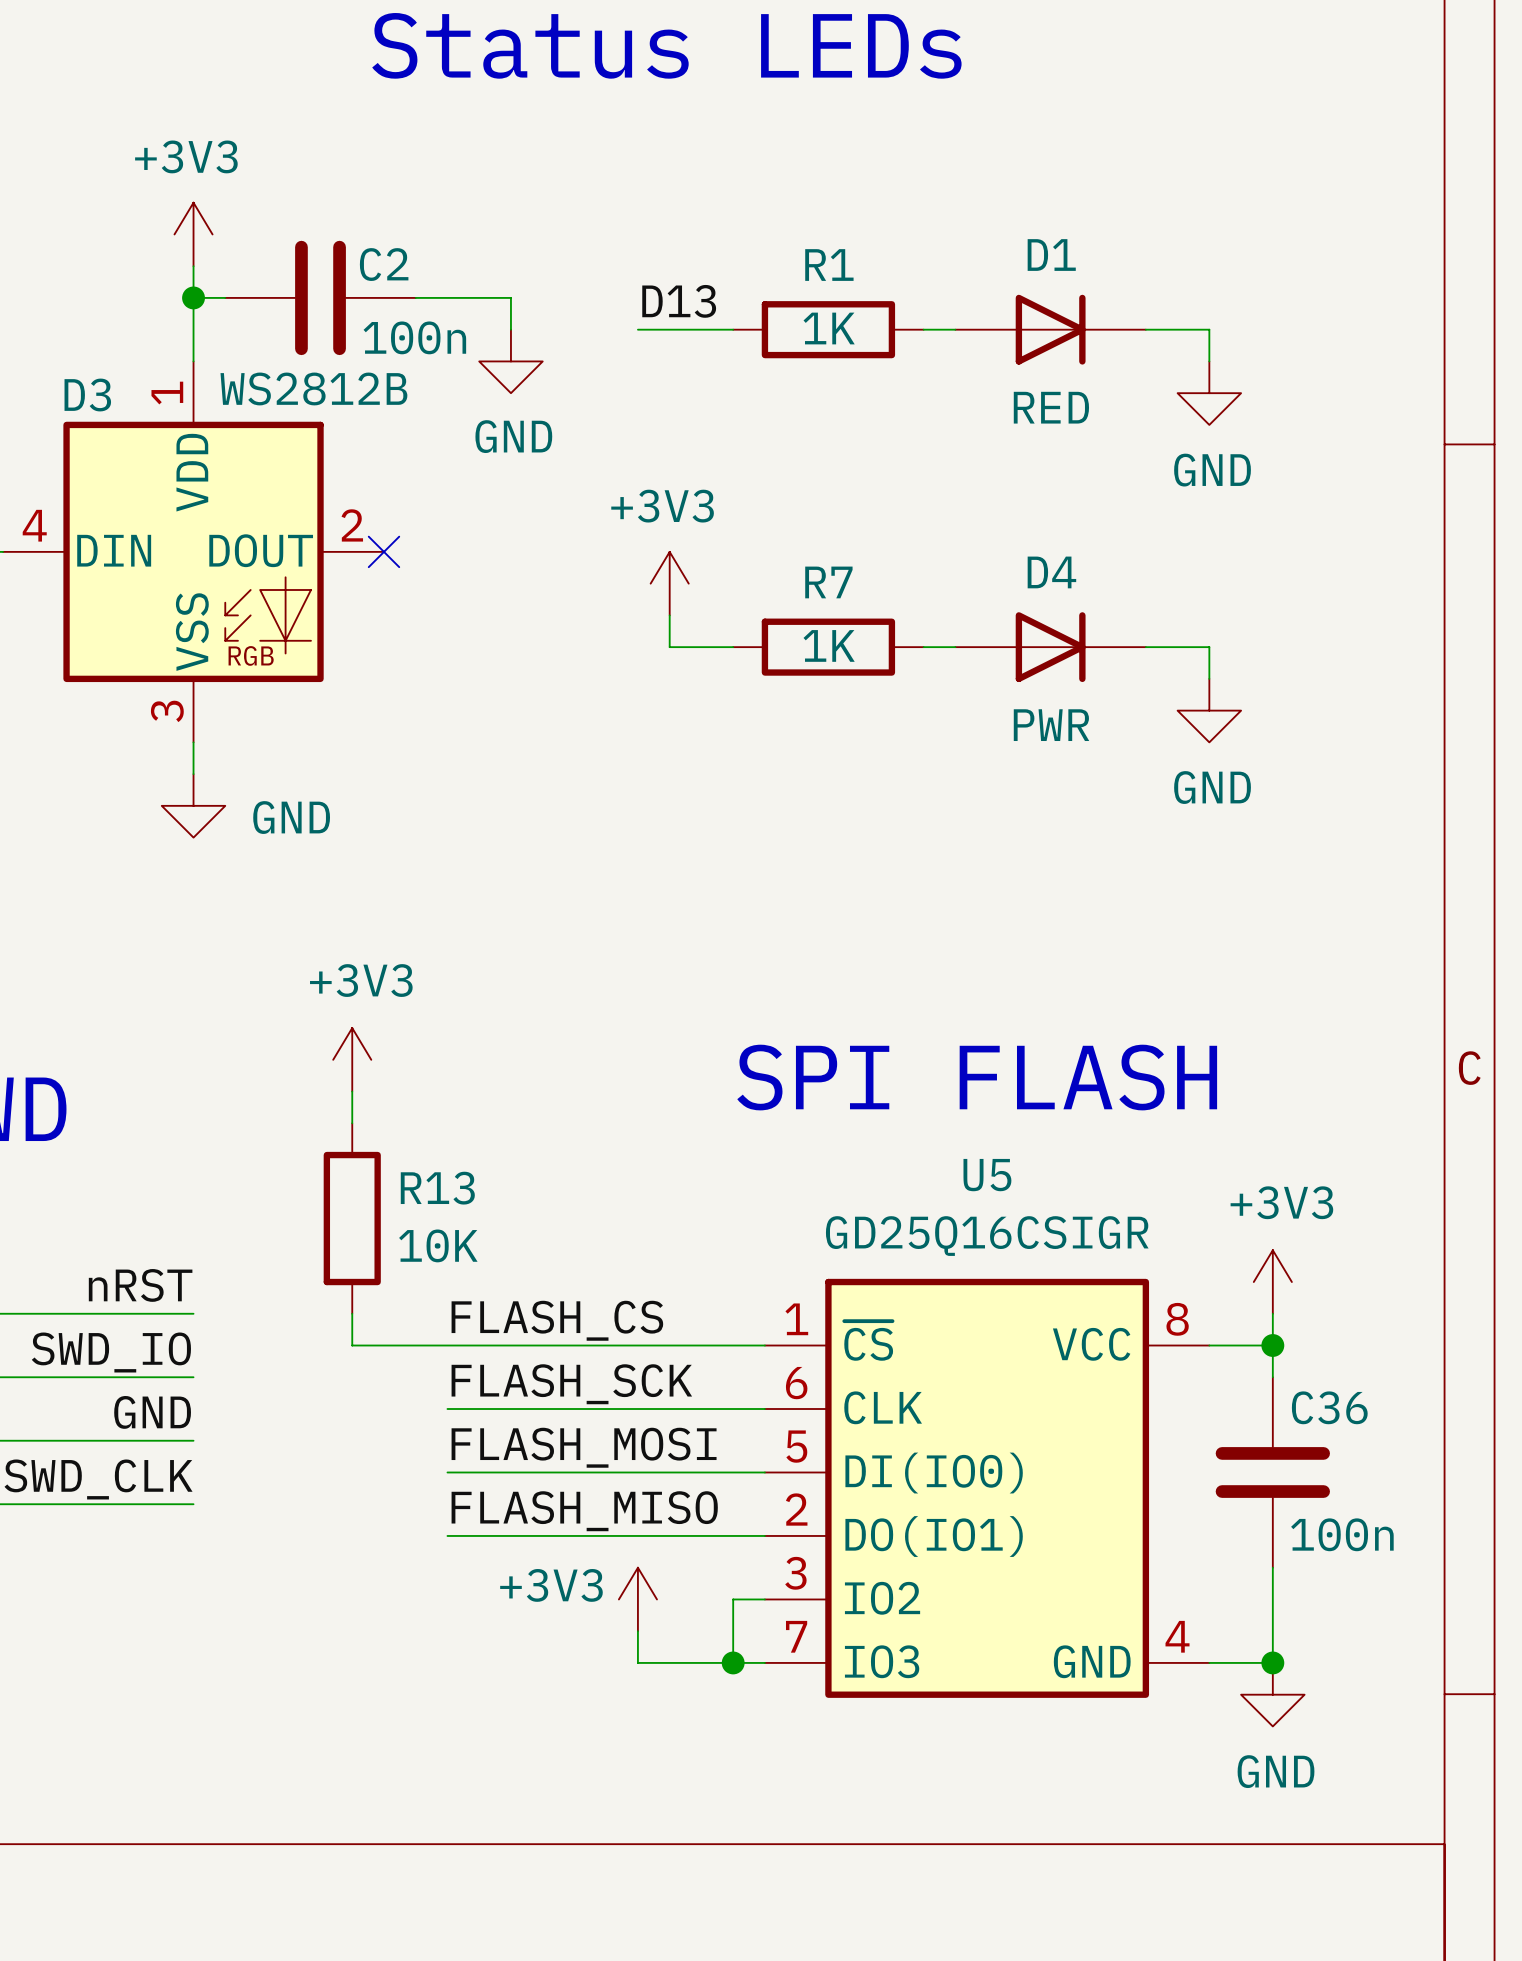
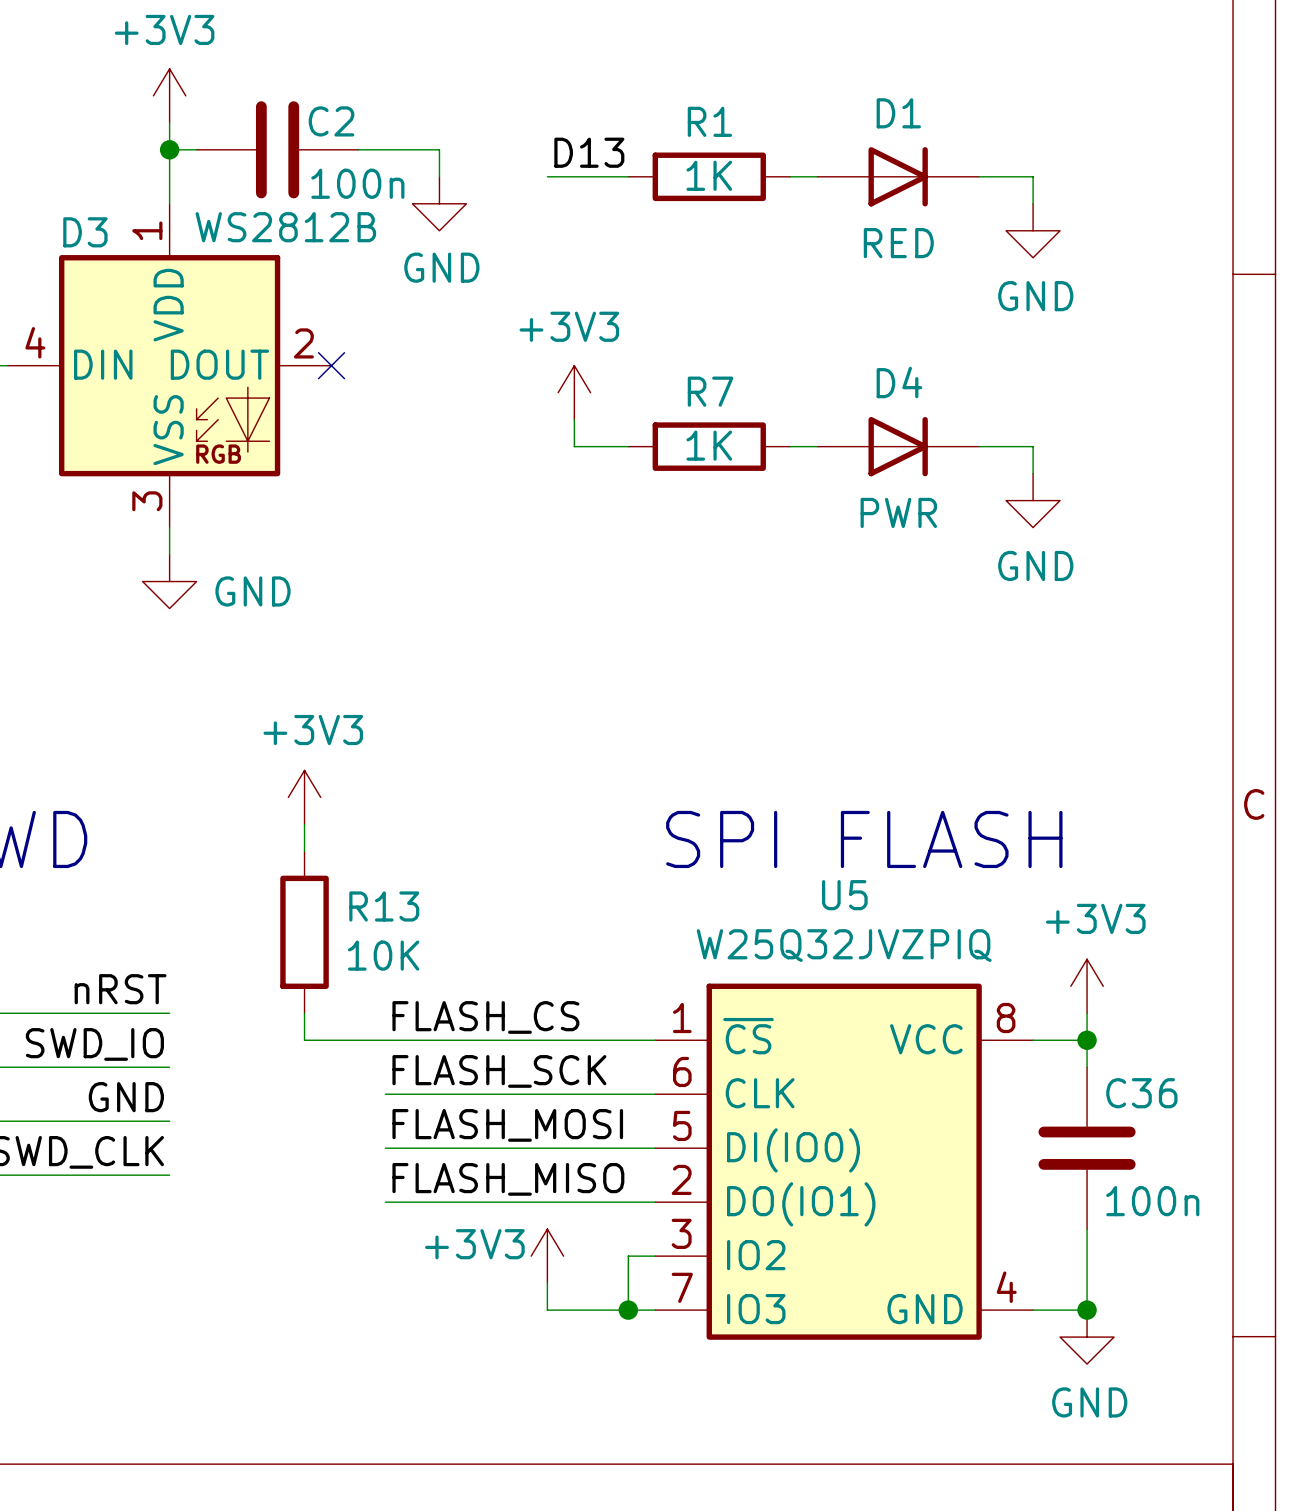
text position: SPI FLASH (977, 1077) -> SPI FLASH (864, 839)
U5 value: GD25Q16CSIGR (987, 1236) -> W25Q32JVZPIQ (844, 945)

